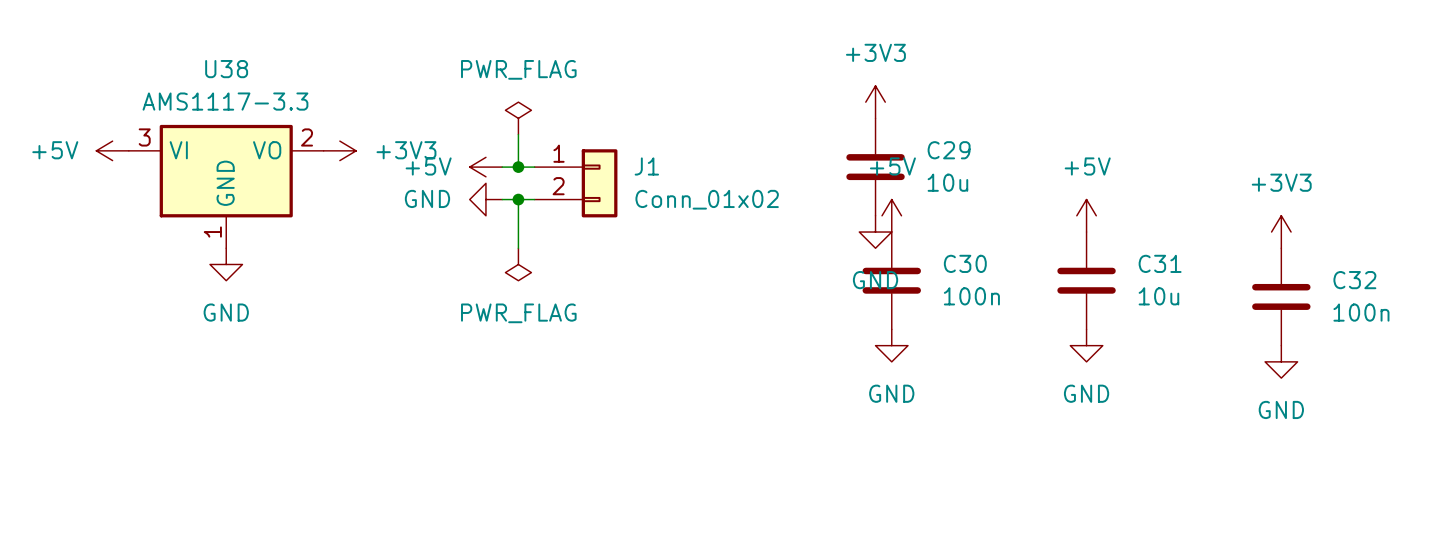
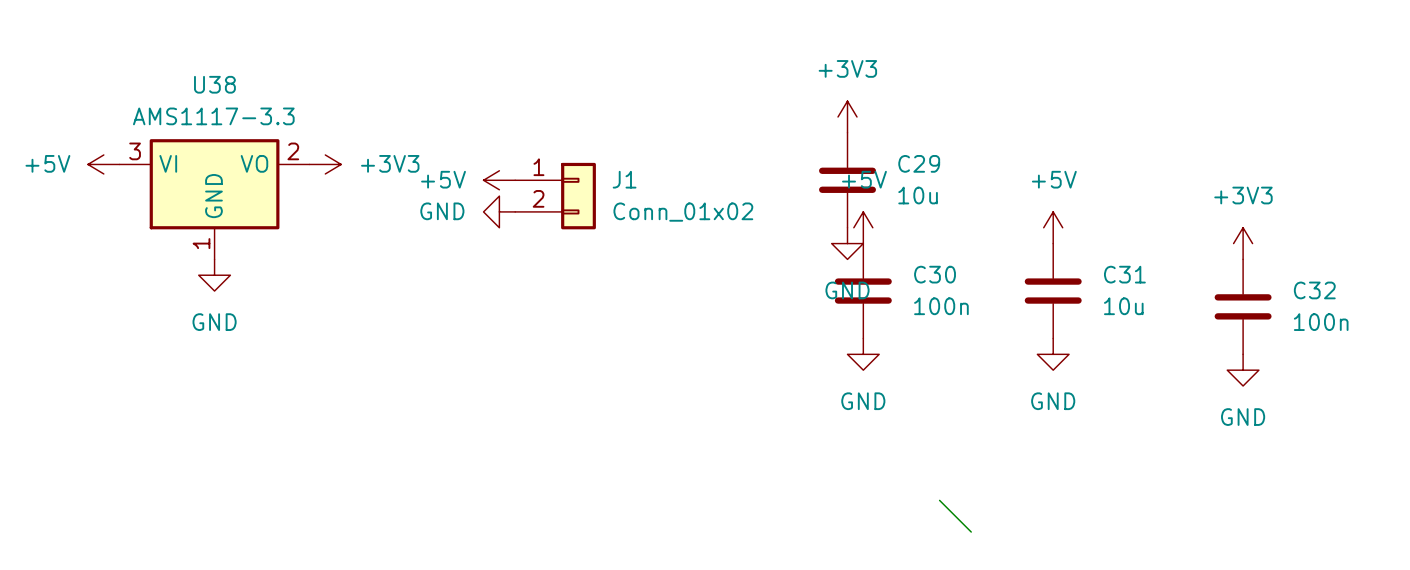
power symbol: PWR_FLAG (518, 118) -> none
wire: (518, 134) (518, 167) -> none
power symbol position: +5V (485, 167) -> +5V (499, 180)
junction: (518, 167) -> none
power symbol position: GND (485, 199) -> GND (499, 211)
wire: (518, 199) (518, 248) -> none
junction: (518, 199) -> none
power symbol: PWR_FLAG (518, 264) -> none
wire: none -> (939, 500) (971, 532)

